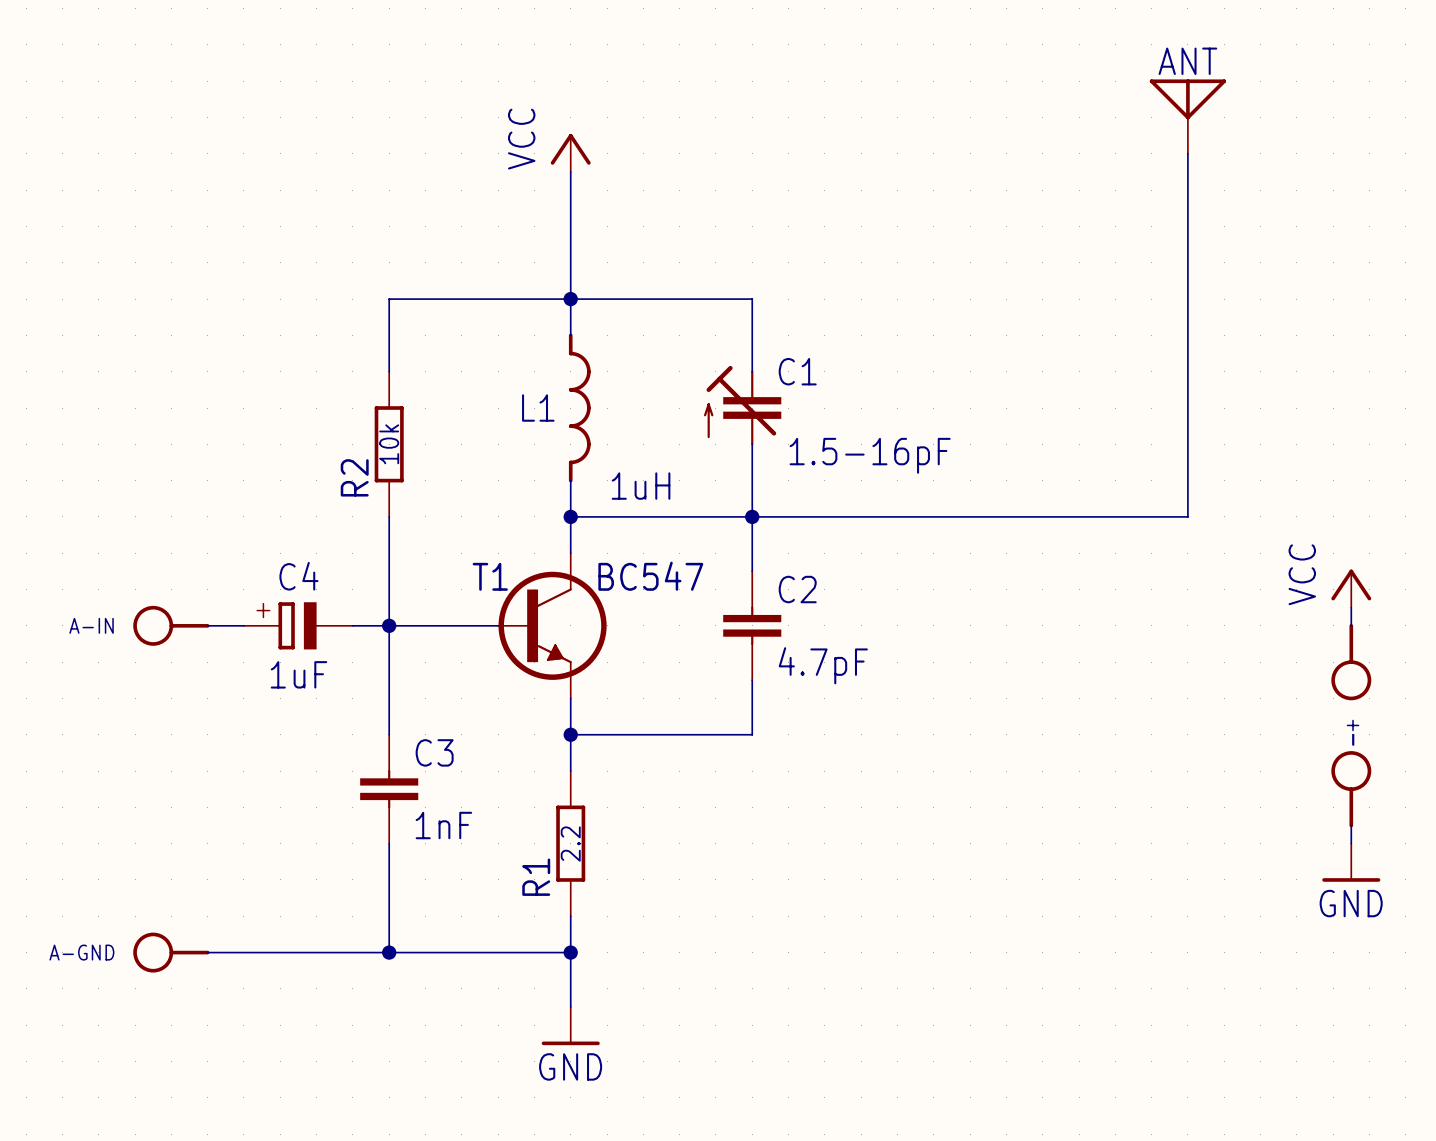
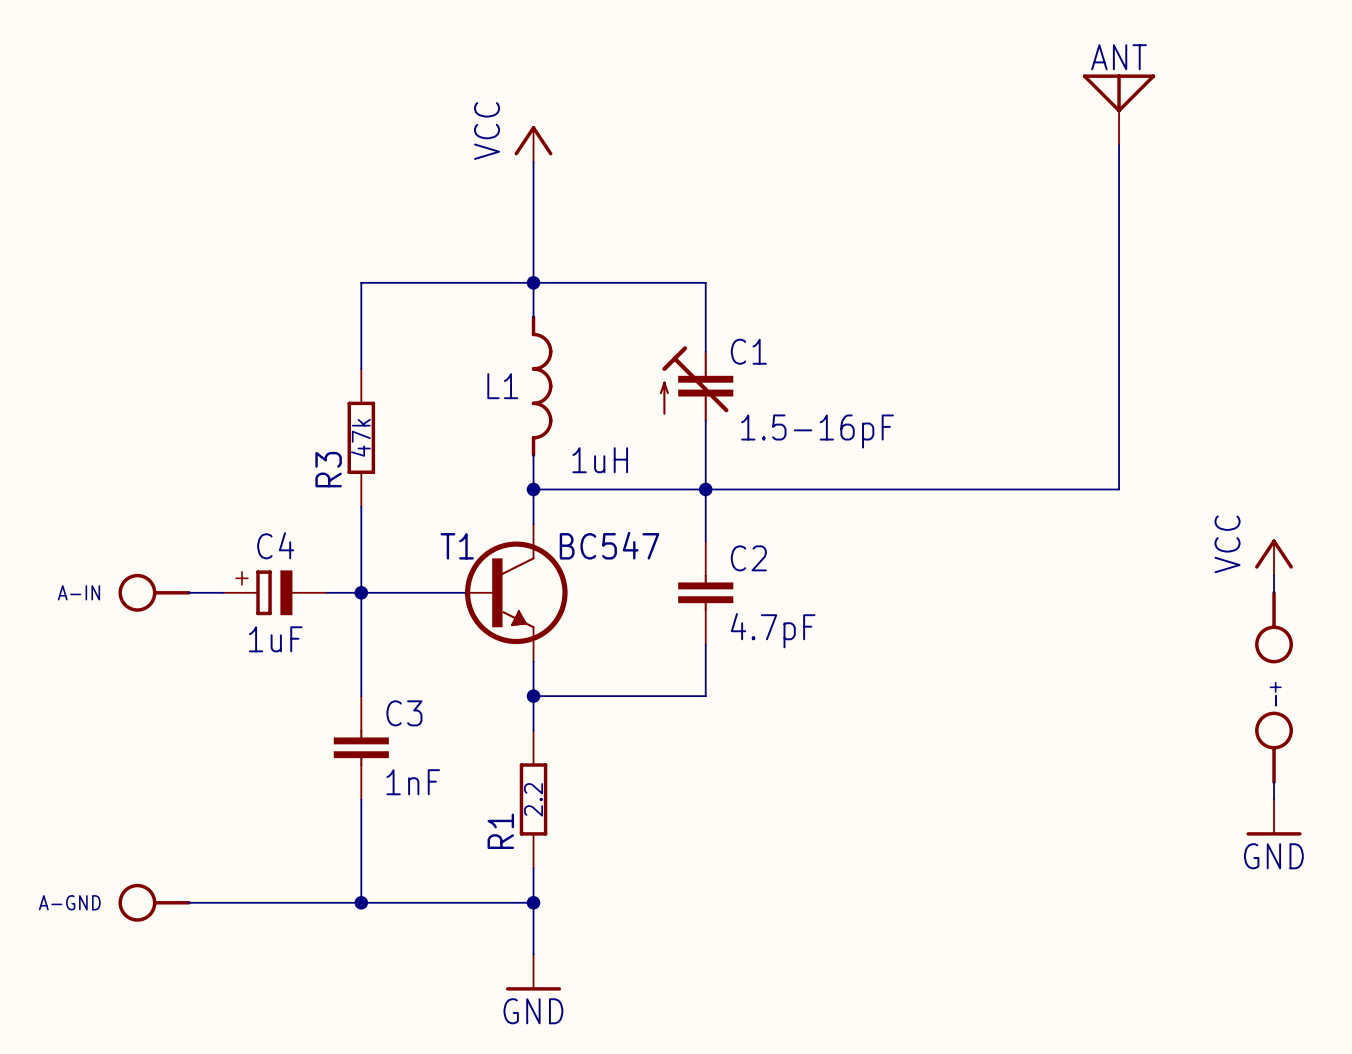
R2: 10k (389, 444) -> none
R3: none -> 47k (361, 437)

